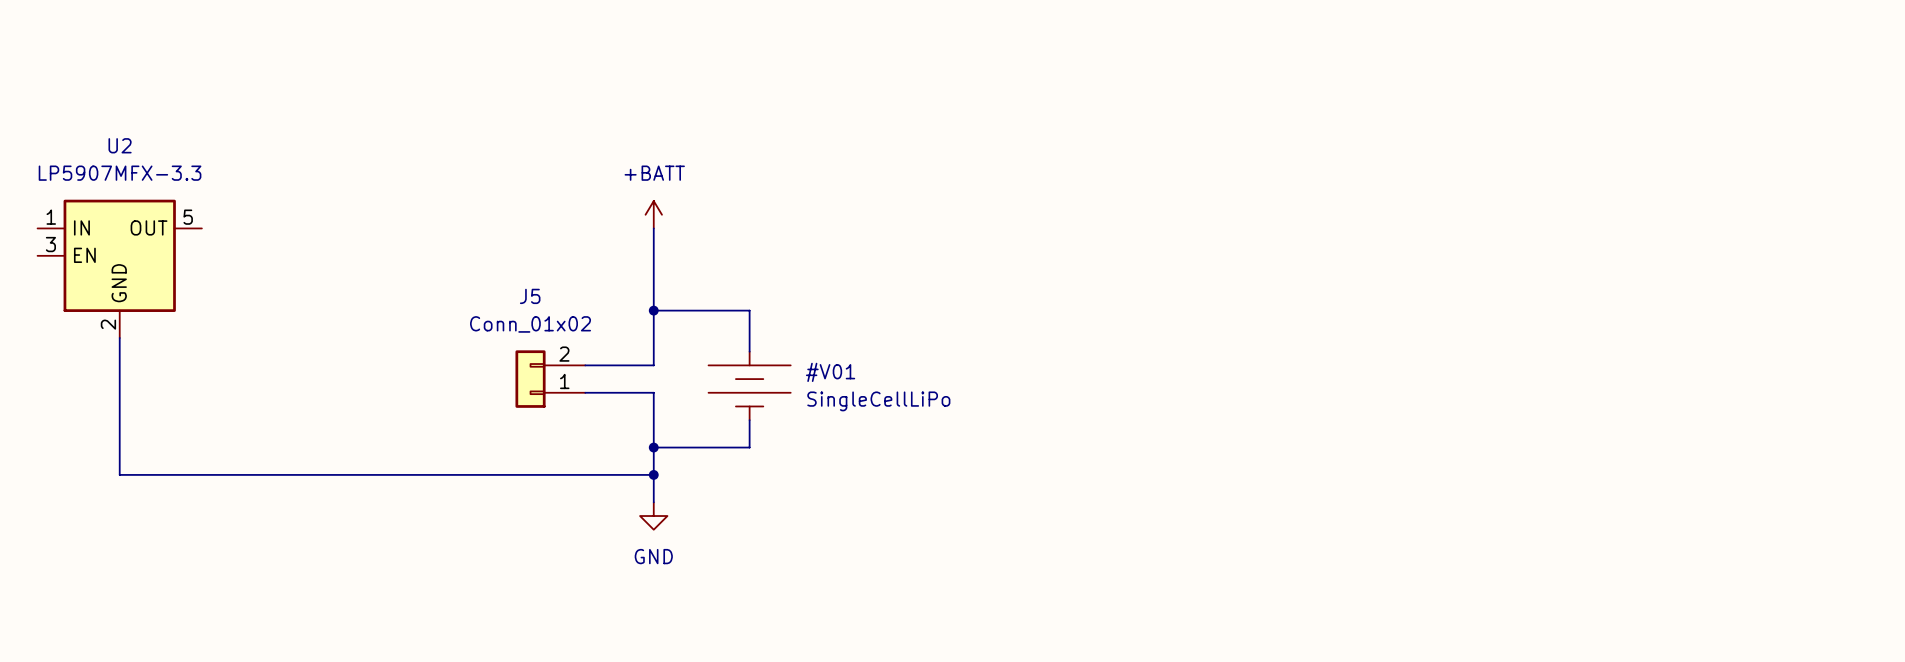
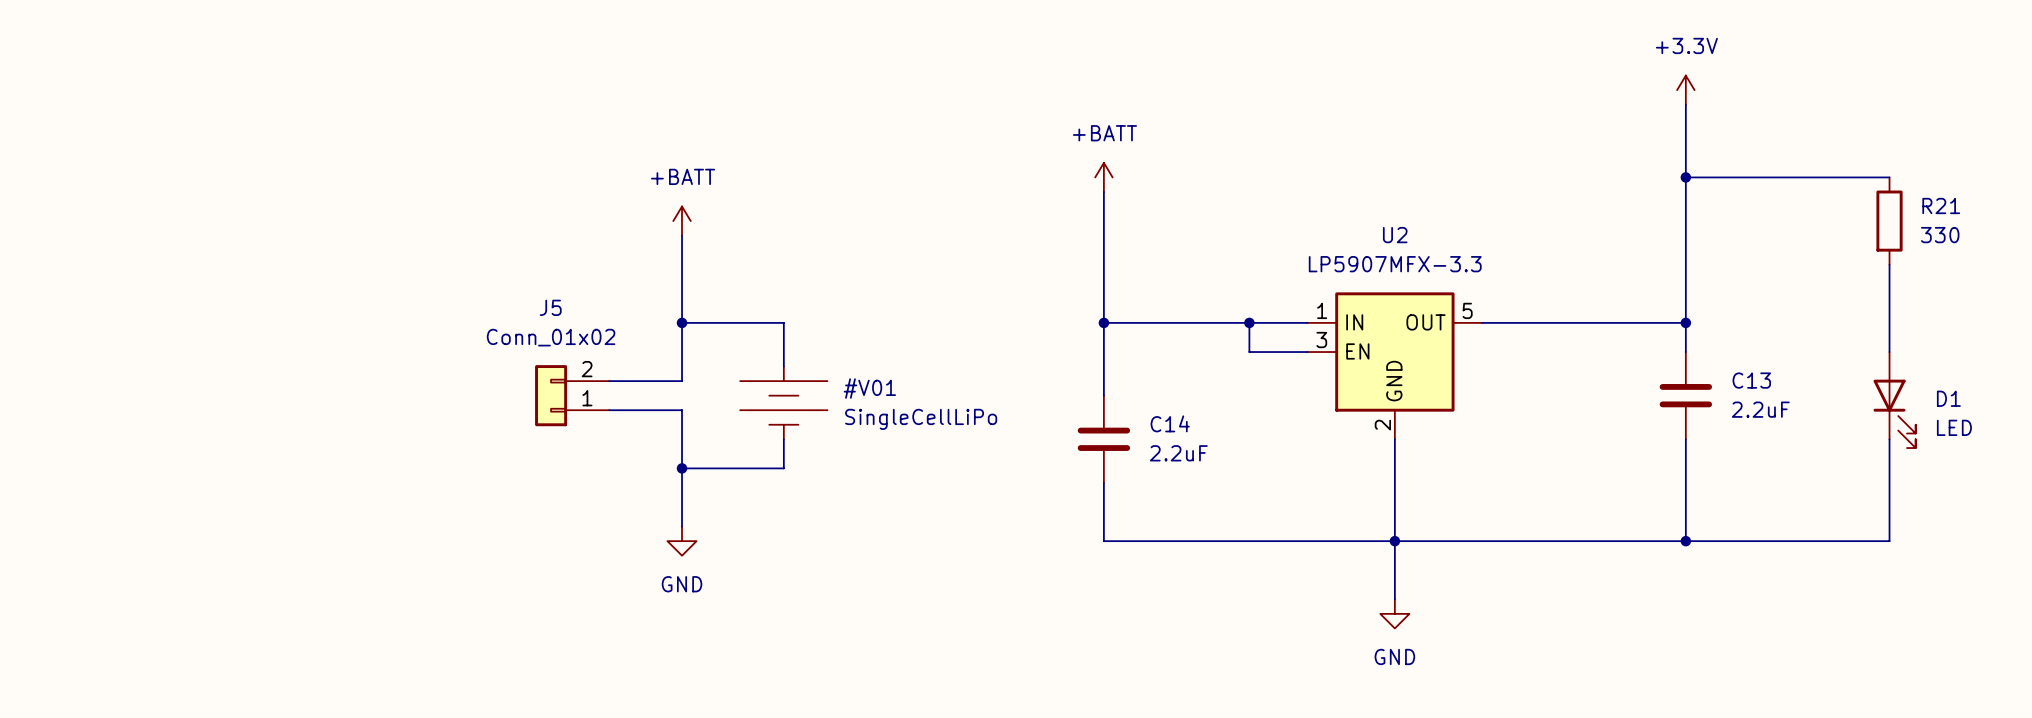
power symbol: none -> +3.3V (1685, 90)
wire: none -> (1685, 104) (1685, 352)
power symbol: none -> +BATT (1103, 177)
wire: none -> (1685, 177) (1889, 177)
junction: none -> (1685, 177)
wire: none -> (1103, 191) (1103, 395)
R21: none -> 330 (1889, 221)
wire: none -> (1889, 264) (1889, 352)
U2 position: (119, 268) -> (1394, 365)
wire: none -> (1103, 322) (1307, 322)
junction: none -> (1103, 322)
wire: none -> (1249, 322) (1249, 352) (1307, 352)
junction: none -> (1249, 322)
wire: none -> (1482, 322) (1685, 322)
junction: none -> (1685, 322)
wire: (119, 338) (119, 474) (653, 474) -> none
C13: none -> 2.2uF (1685, 395)
D1: none -> LED (1894, 400)
C14: none -> 2.2uF (1103, 439)
wire: none -> (1394, 439) (1394, 599)
wire: none -> (1685, 439) (1685, 541)
wire: none -> (1889, 439) (1889, 541) (1103, 541) (1103, 482)
junction: (653, 474) -> none
junction: none -> (1394, 541)
junction: none -> (1685, 541)
power symbol: none -> GND (1394, 613)

